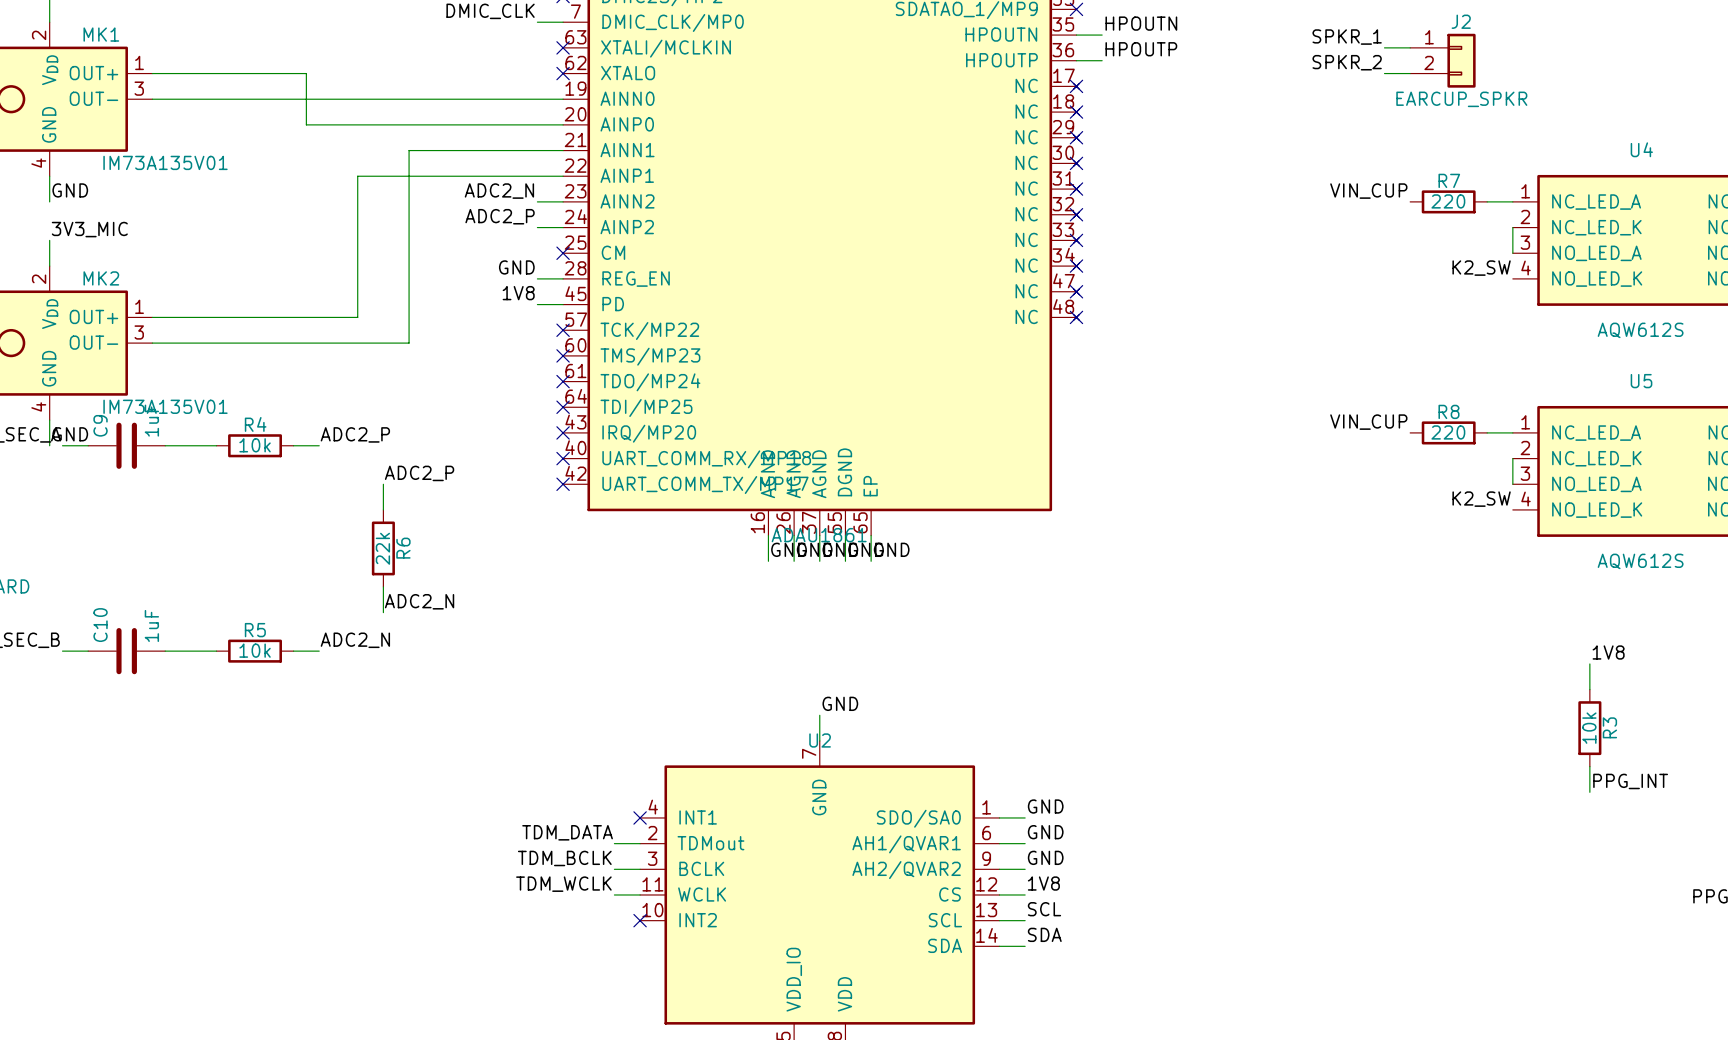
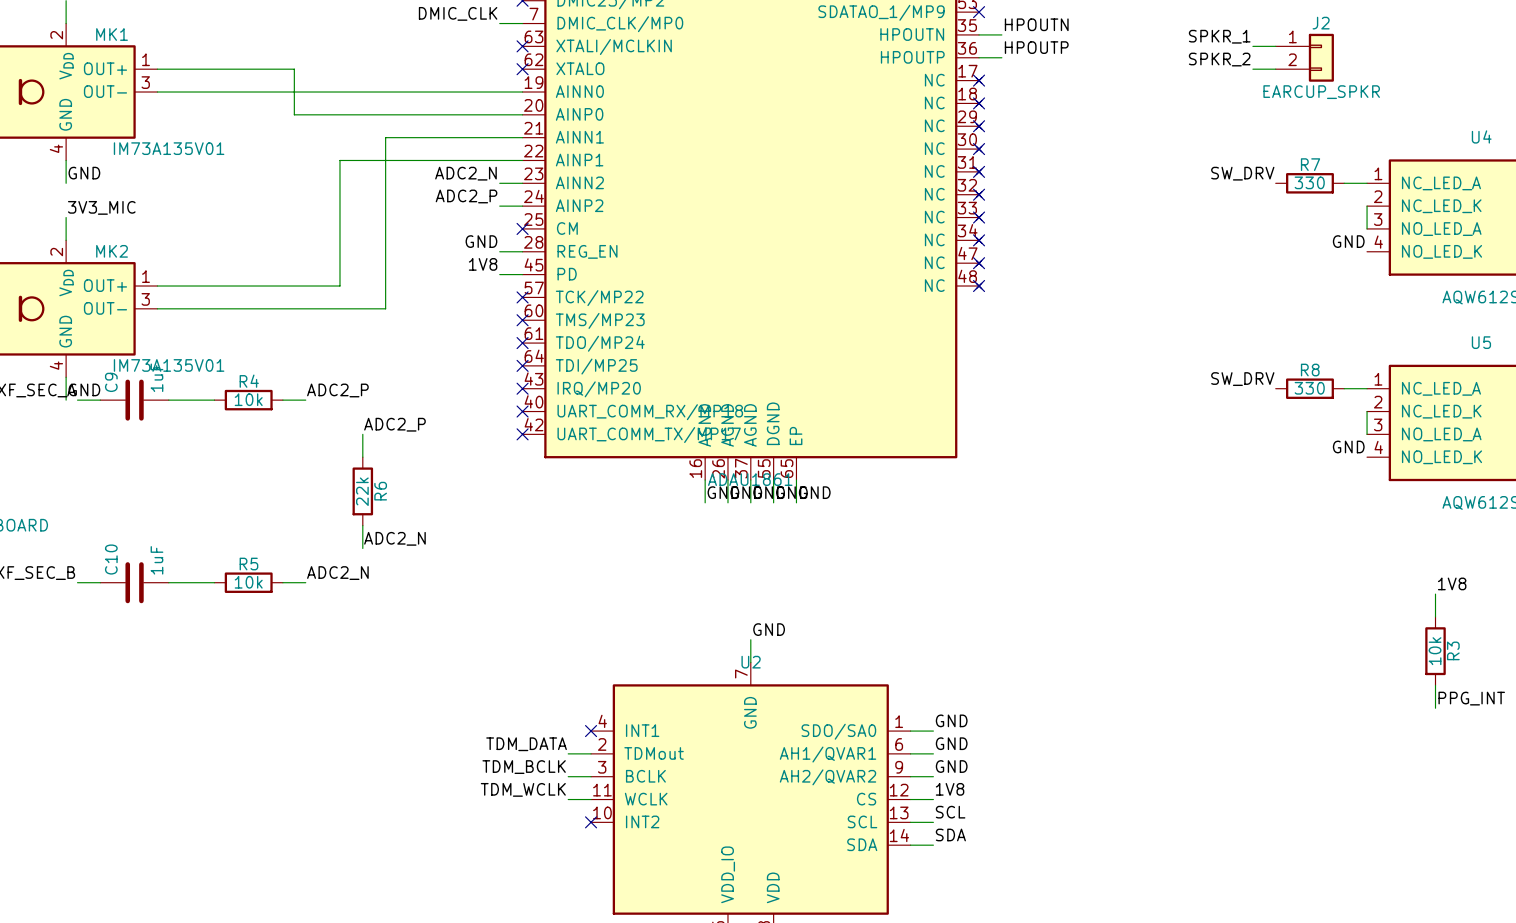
label: VIN_CUP (1368, 191) -> SW_DRV (1242, 173)
R7 value: 220 (1448, 201) -> 330 (1309, 182)
label: K2_SW (1481, 268) -> GND (1348, 241)
label: VIN_CUP (1368, 422) -> SW_DRV (1242, 379)
R8 value: 220 (1448, 432) -> 330 (1309, 388)
label: K2_SW (1481, 499) -> GND (1348, 446)

